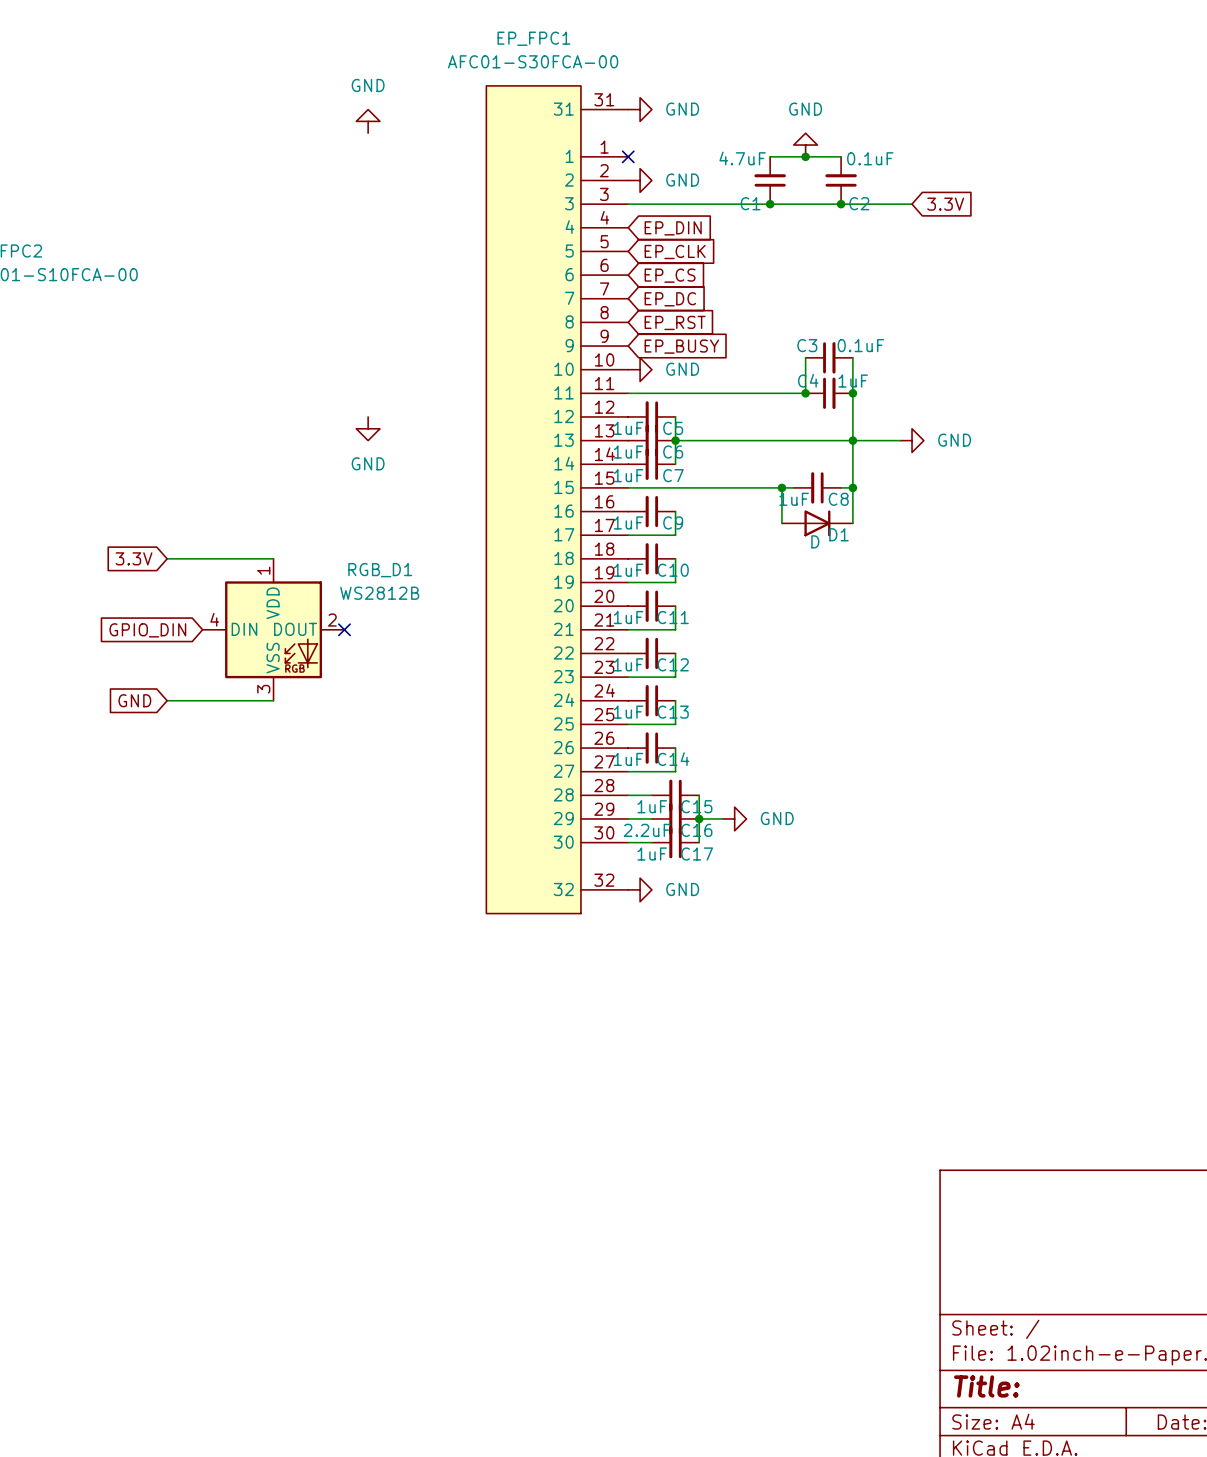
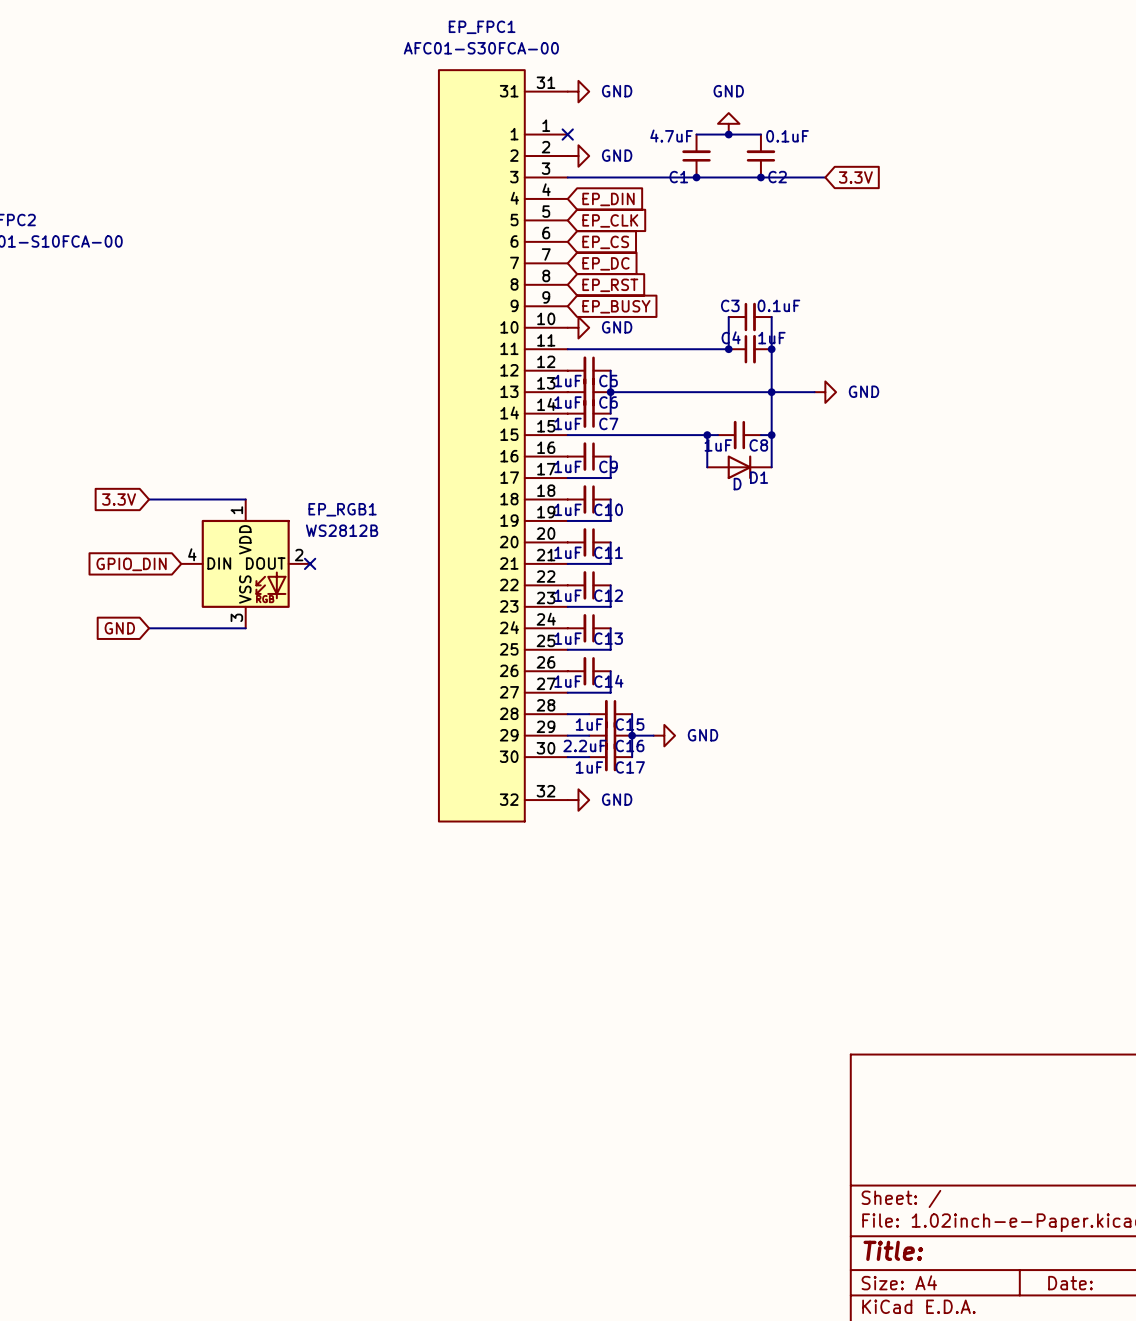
power symbol: GND (368, 121) -> none
power symbol: GND (368, 428) -> none
RGB_D1 name: RGB_D1 (380, 570) -> EP_RGB1 (342, 509)

